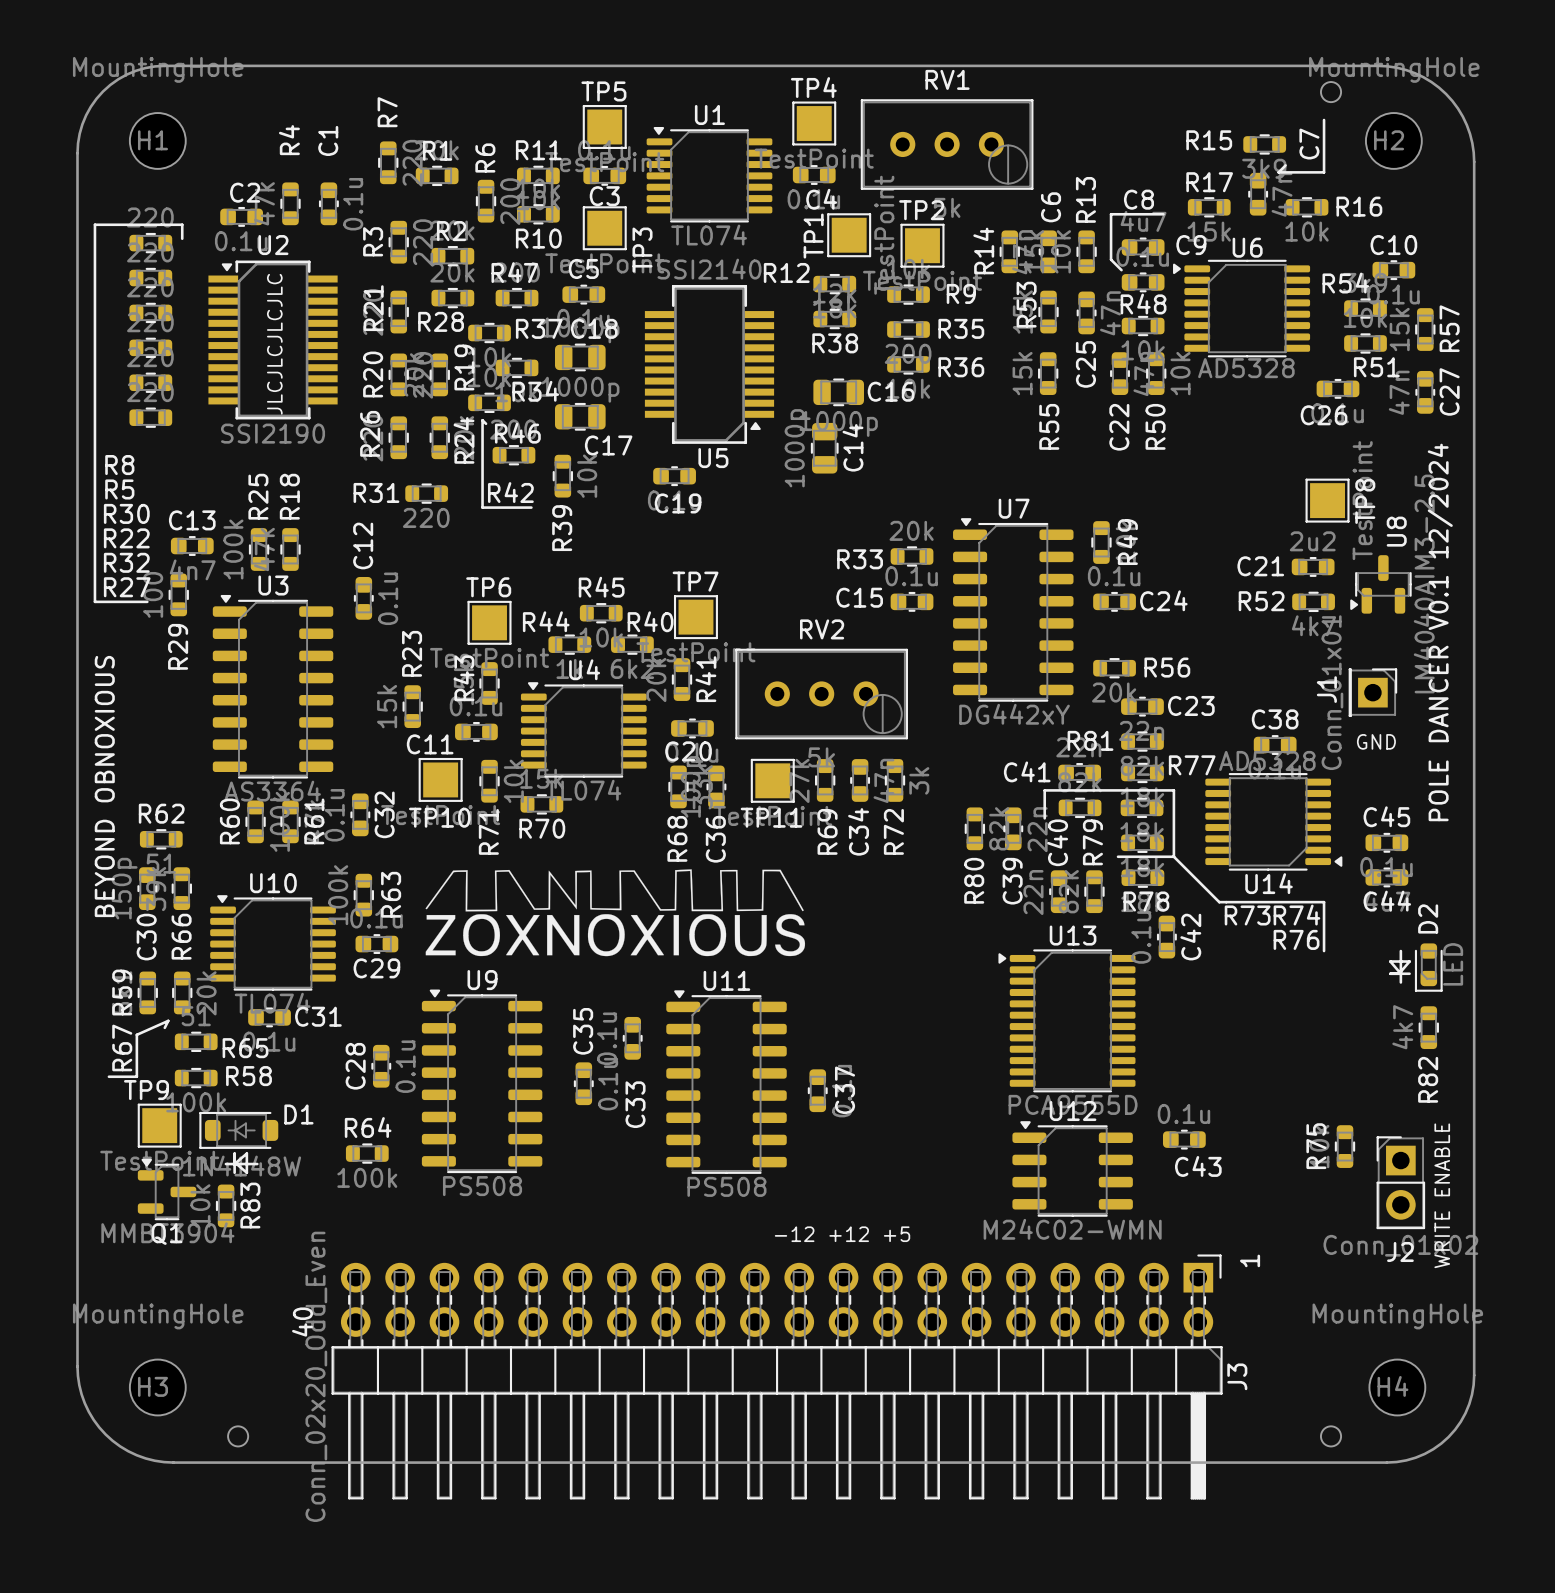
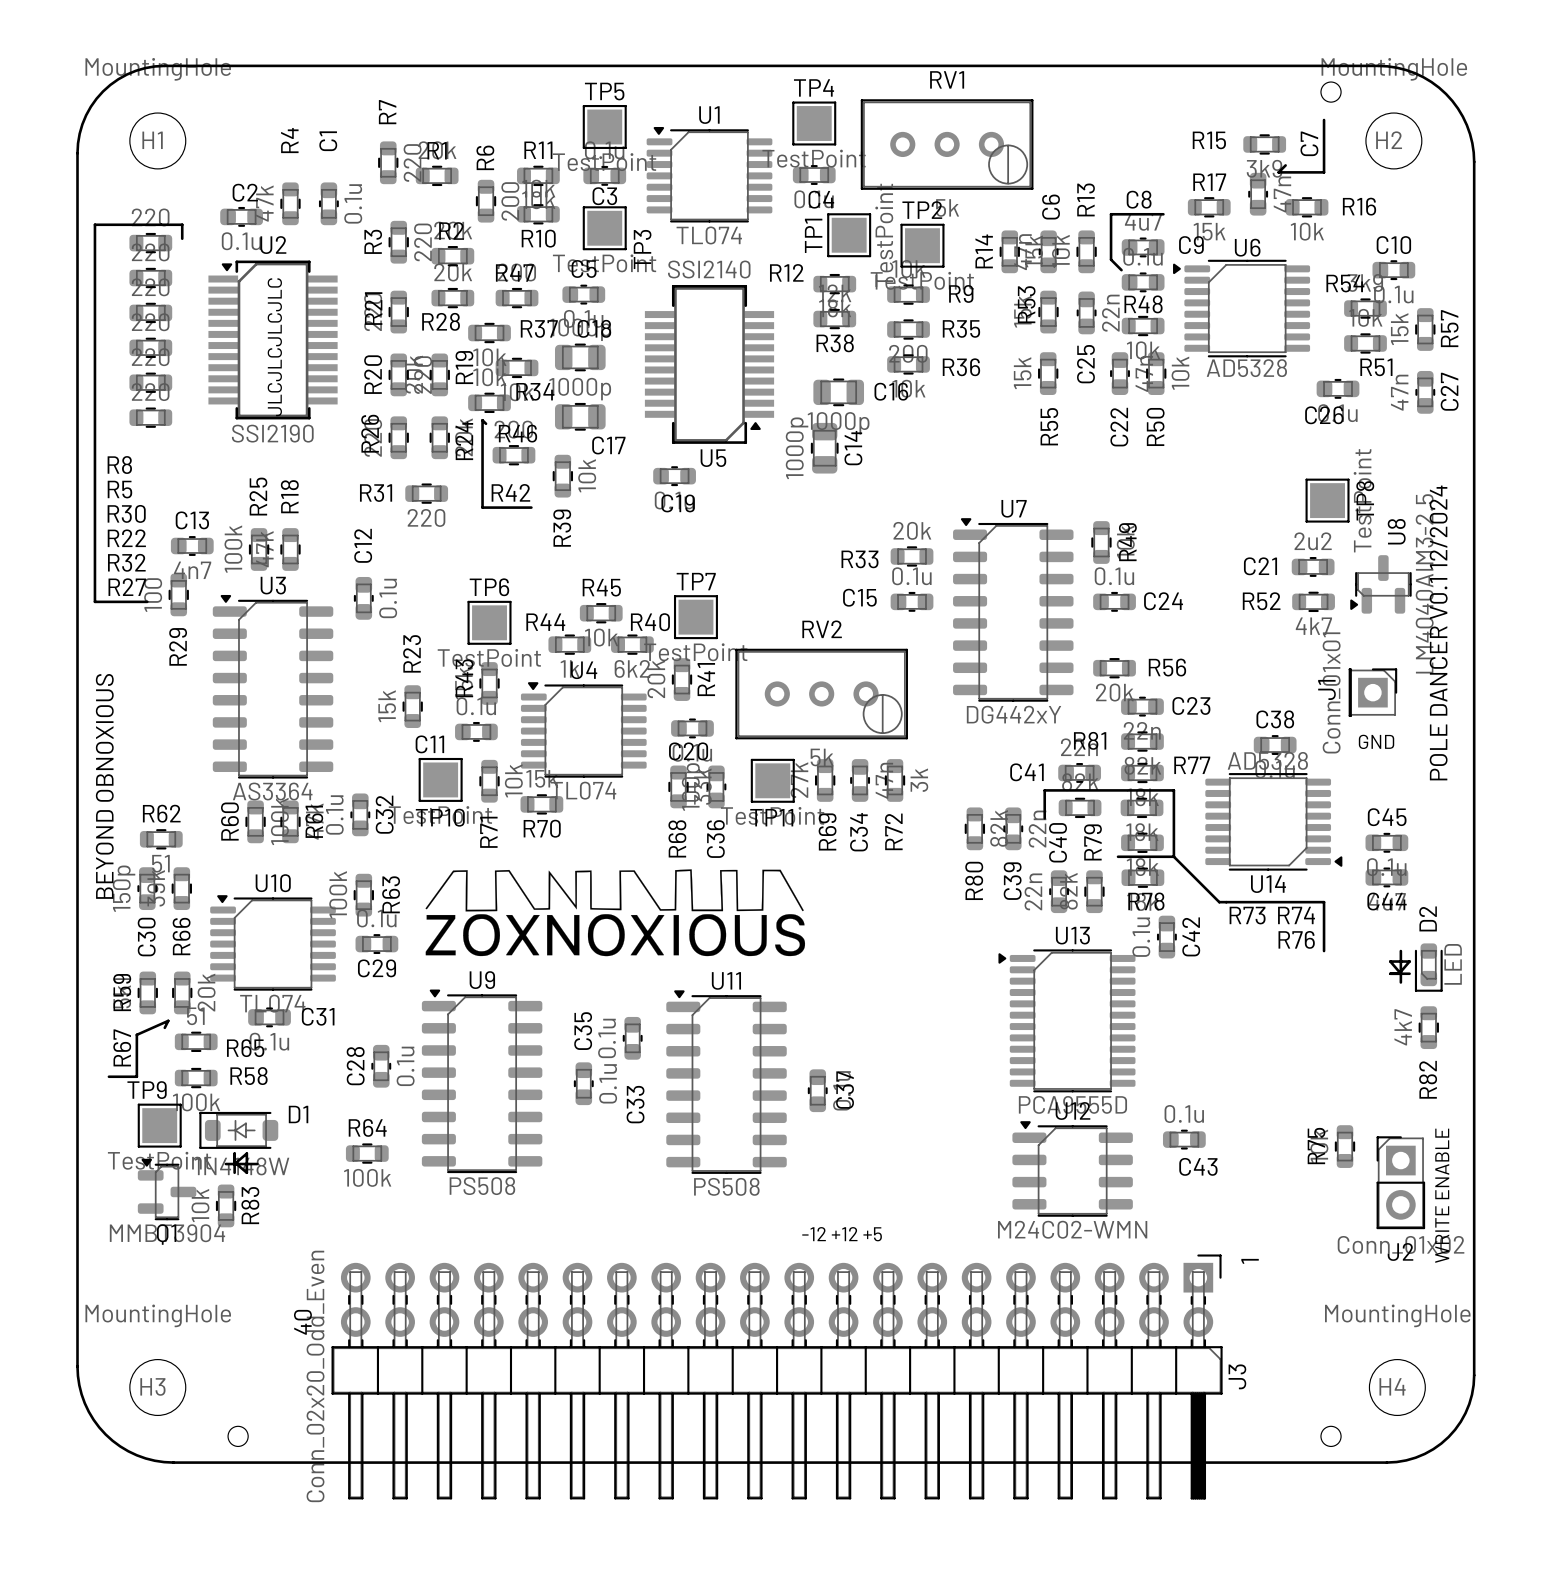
C25 value: 47n (1110, 313) -> 22n (1110, 313)

